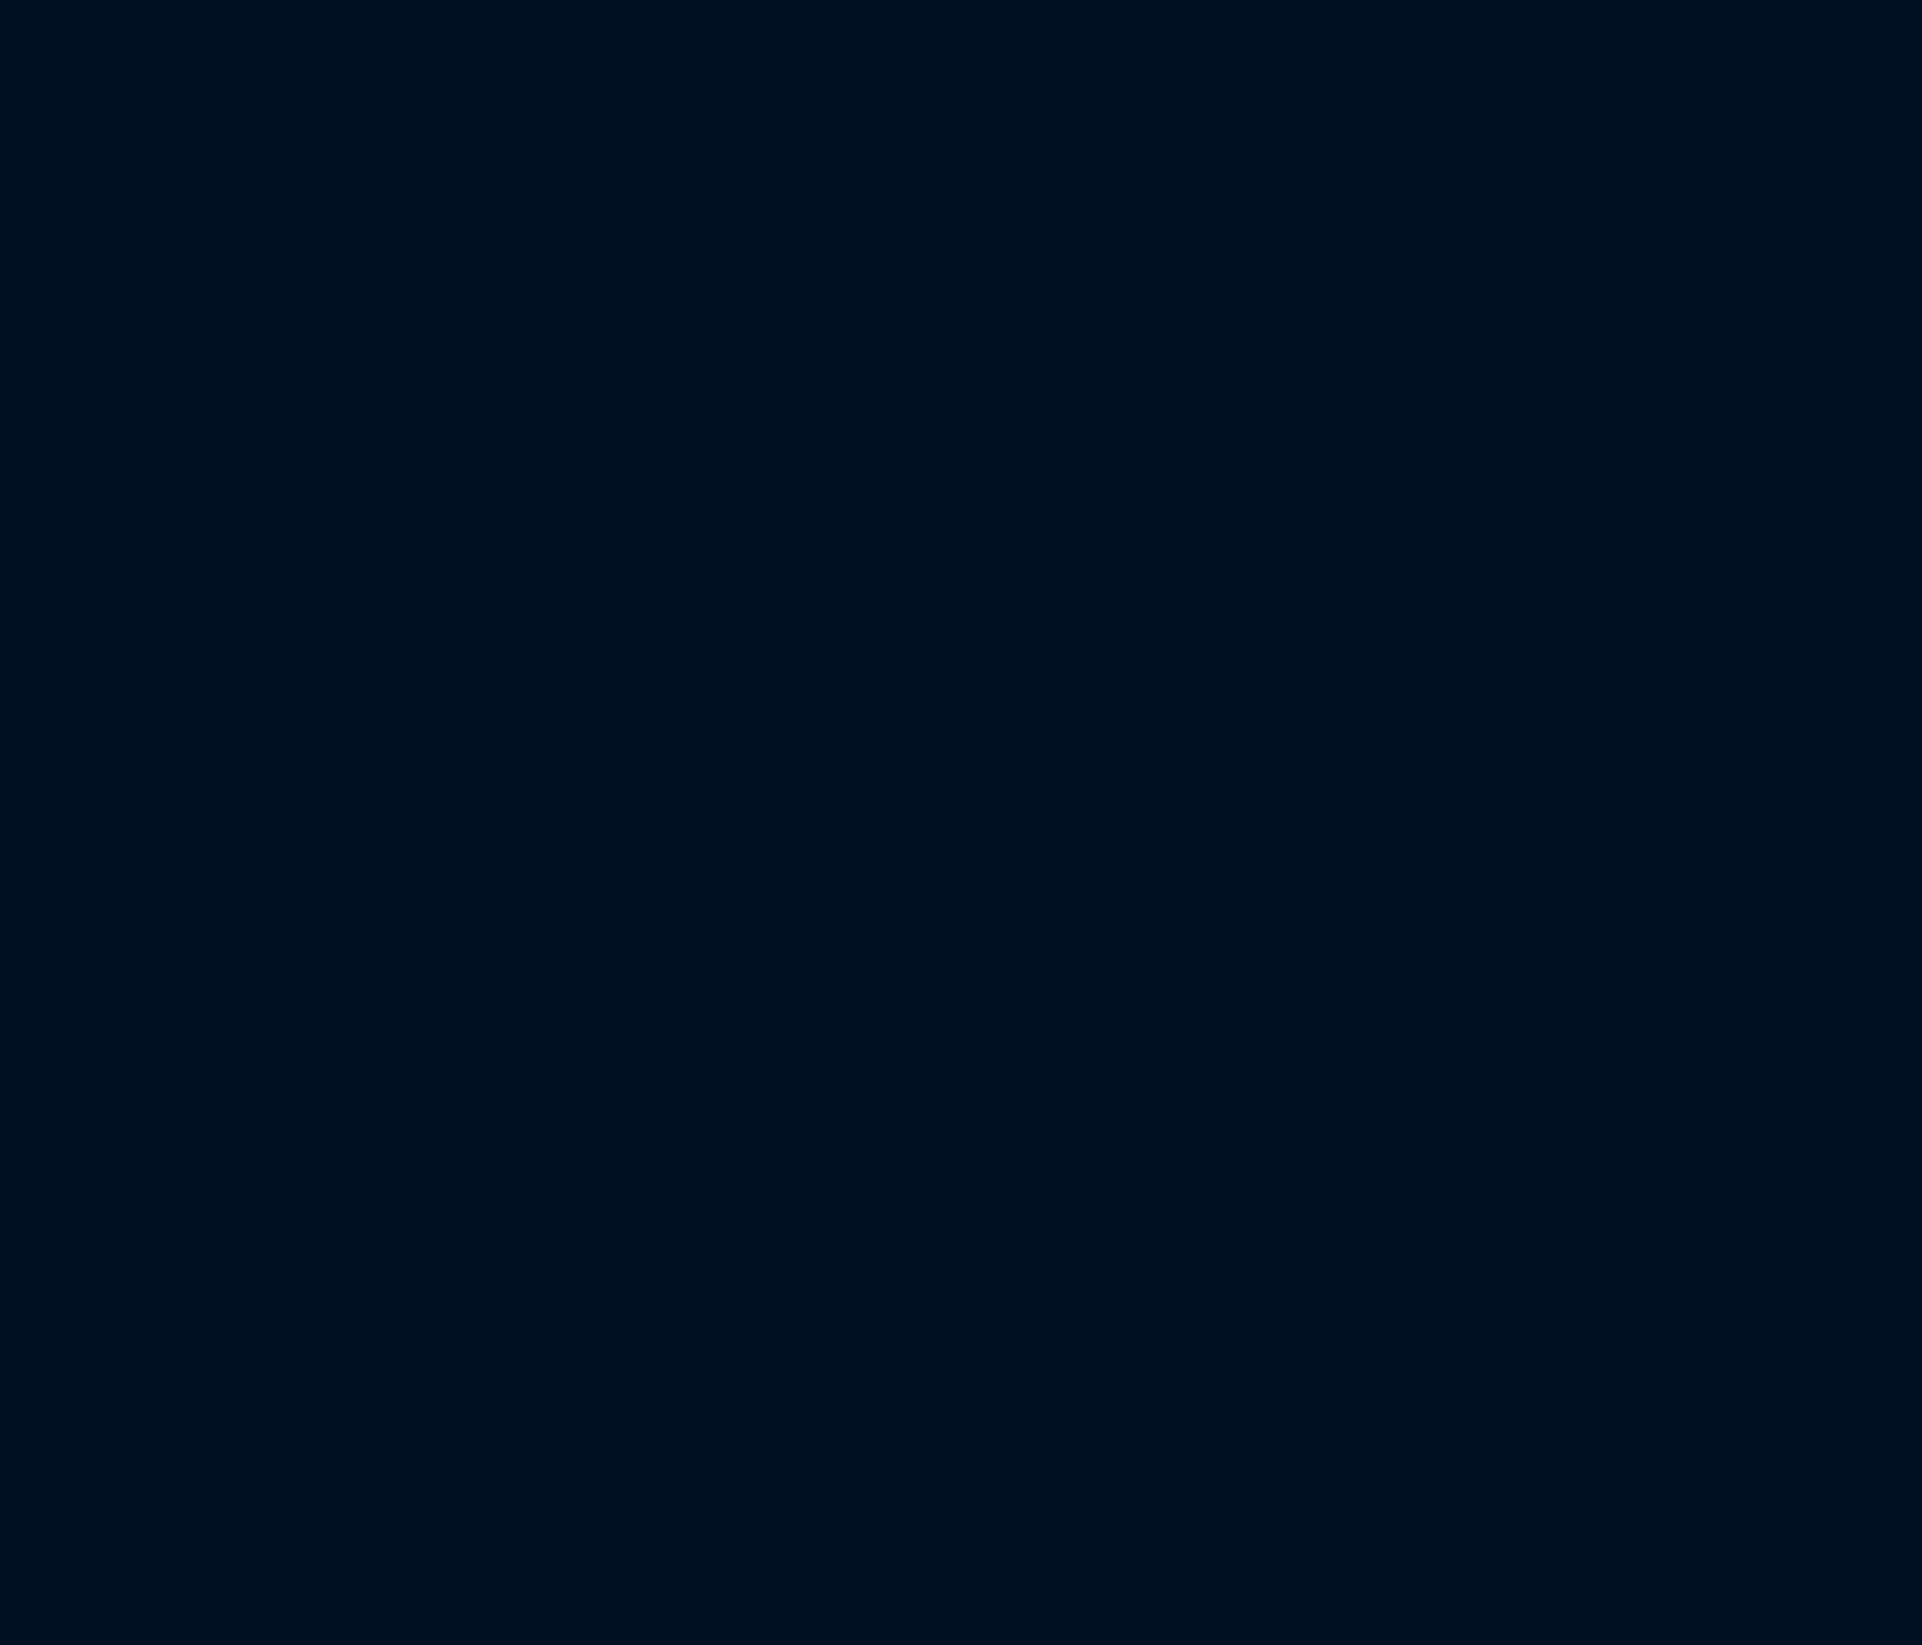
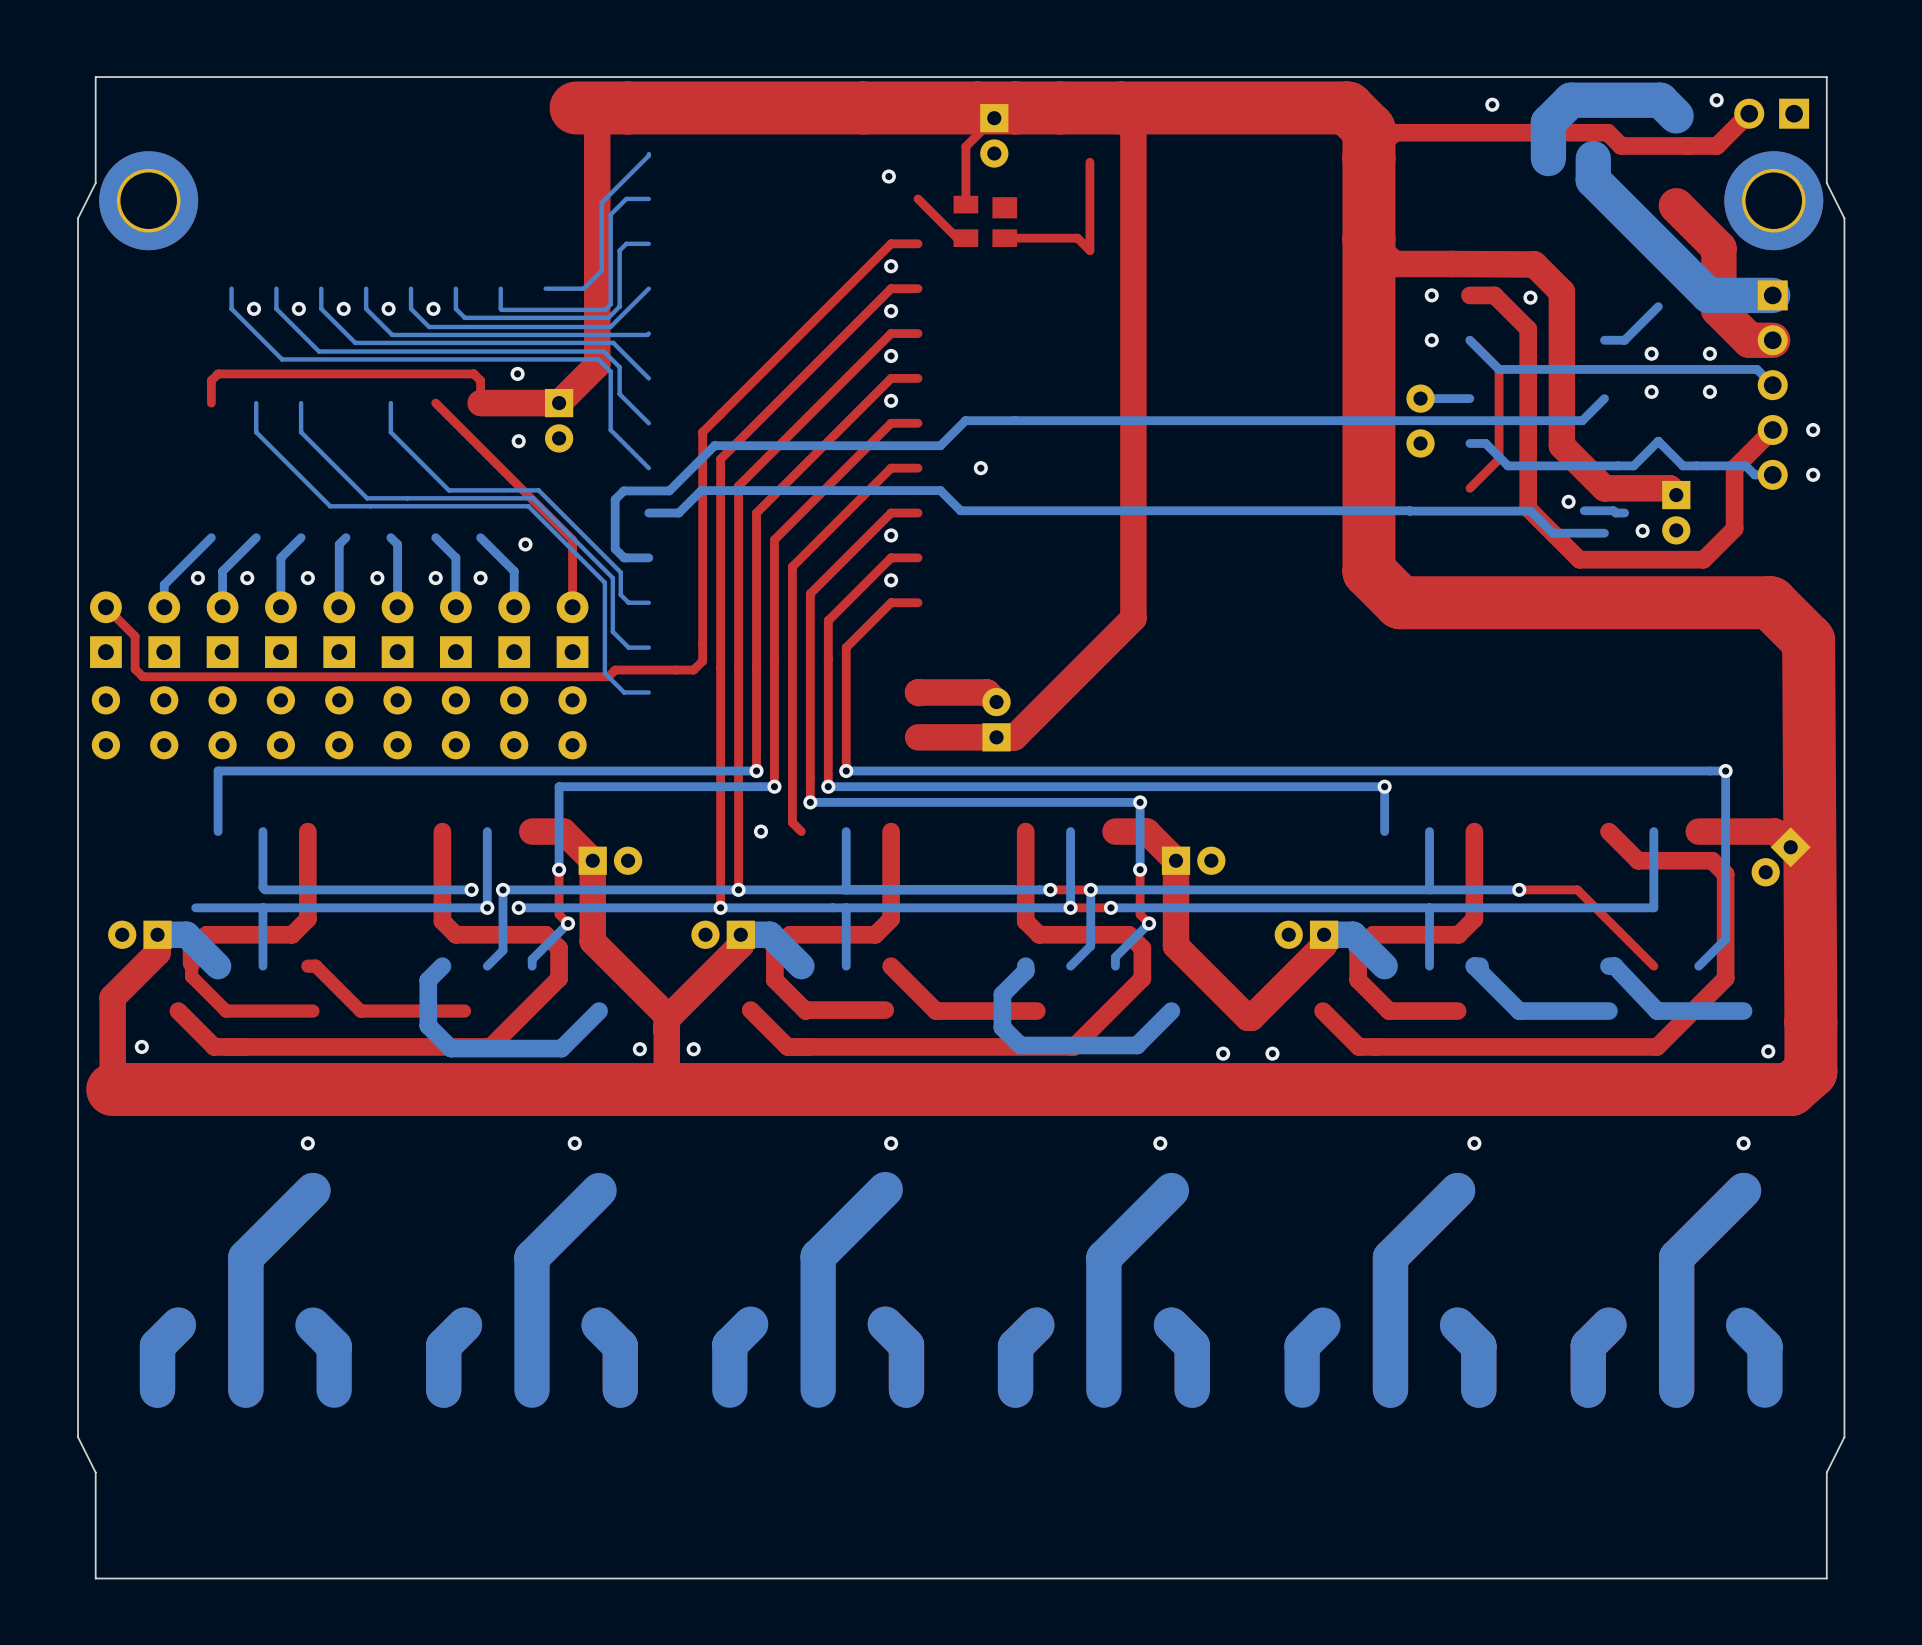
board edge: none -> (1826, 77) (1826, 183) (1844, 218) (1844, 1437) (1826, 1472) (1826, 1578) (95, 1578) (95, 1472) (78, 1437) (78, 218) (95, 183) (95, 77) (1826, 77)
via: none -> (1716, 100)
via: none -> (1492, 104)
top track: none -> (576, 107) (597, 129) (597, 364) (559, 403) (480, 403) (480, 380) (473, 373) (218, 373) (211, 380) (211, 403)
top track: none -> (576, 107) (1347, 107) (1368, 129) (1368, 571) (1400, 602) (1770, 602) (1808, 640) (1810, 1071) (1790, 1089) (112, 1089) (112, 997) (157, 952) (157, 934)
top track: none -> (1120, 107) (1133, 120) (1133, 618) (1014, 737) (918, 737)
top track: none -> (1749, 113) (1716, 145) (1621, 145) (1607, 132) (1394, 132) (1368, 158) (1368, 187)
part: none -> (1771, 113)
bottom track: none -> (1676, 115) (1660, 100) (1570, 100) (1548, 122) (1548, 158)
top track: none -> (994, 118) (965, 146) (965, 204)
part: none -> (994, 135)
bottom track: none -> (648, 154) (601, 202) (601, 270) (583, 288) (545, 288)
bottom track: none -> (1593, 158) (1593, 180) (1708, 295) (1772, 295)
top track: none -> (1089, 162) (1089, 250) (1077, 238) (1004, 238)
via: none -> (888, 176)
bottom track: none -> (648, 198) (626, 198) (610, 214) (610, 304) (605, 309) (501, 309) (500, 288)
top track: none -> (918, 198) (957, 238) (965, 238)
part: none -> (148, 200)
part: none -> (1773, 200)
top track: none -> (1676, 205) (1718, 248) (1718, 309) (1749, 340) (1772, 340)
part: none -> (985, 221)
top track: none -> (1368, 239) (1393, 264) (1534, 264) (1561, 291) (1561, 445) (1604, 488) (1669, 488) (1676, 495)
bottom track: none -> (648, 243) (626, 243) (619, 250) (619, 306) (608, 317) (464, 317) (455, 308) (455, 288)
top track: none -> (918, 243) (891, 243) (702, 432) (702, 661) (693, 670) (615, 670) (608, 676) (142, 676) (135, 669) (135, 636) (105, 607)
via: none -> (891, 266)
bottom track: none -> (231, 288) (231, 308) (282, 359) (598, 359) (610, 371) (610, 430) (648, 468)
bottom track: none -> (276, 288) (276, 308) (319, 351) (603, 351) (619, 367) (619, 394) (648, 423)
bottom track: none -> (321, 288) (321, 308) (355, 342) (613, 342) (648, 378)
bottom track: none -> (366, 288) (366, 308) (392, 334) (648, 333)
bottom track: none -> (648, 288) (610, 327) (429, 327) (411, 308) (411, 288)
top track: none -> (918, 288) (891, 288) (720, 459) (720, 907)
via: none -> (1431, 295)
top track: none -> (1469, 295) (1494, 295) (1528, 329) (1528, 508) (1579, 559) (1703, 559) (1734, 528) (1734, 468) (1772, 430)
via: none -> (1530, 297)
bottom track: none -> (1658, 306) (1624, 340) (1604, 340)
via: none -> (253, 308)
via: none -> (298, 308)
via: none -> (343, 308)
via: none -> (388, 308)
via: none -> (433, 308)
via: none -> (891, 311)
top track: none -> (918, 333) (891, 333) (738, 486) (738, 889)
via: none -> (1431, 340)
bottom track: none -> (1469, 340) (1499, 369) (1757, 369) (1772, 385)
top track: none -> (1469, 340) (1499, 369) (1499, 459) (1469, 488)
via: none -> (1651, 353)
via: none -> (1709, 353)
via: none -> (891, 355)
via: none -> (517, 373)
top track: none -> (918, 378) (891, 378) (756, 513) (756, 771)
part: none -> (1772, 385)
via: none -> (1651, 391)
via: none -> (1709, 391)
bottom track: none -> (1469, 398) (1420, 398)
bottom track: none -> (1604, 398) (1582, 420) (965, 420) (940, 445) (714, 445) (669, 490) (623, 490) (615, 499) (615, 548) (624, 557) (648, 557)
via: none -> (891, 400)
bottom track: none -> (256, 403) (256, 432) (330, 506) (528, 506) (604, 582) (604, 673) (624, 692) (648, 692)
bottom track: none -> (301, 403) (301, 432) (367, 498) (533, 498) (612, 577) (612, 631) (628, 647) (648, 647)
bottom track: none -> (390, 403) (390, 432) (448, 490) (538, 490) (620, 572) (620, 594) (628, 602) (648, 602)
top track: none -> (435, 403) (572, 539) (572, 607)
part: none -> (559, 420)
part: none -> (1420, 421)
top track: none -> (918, 423) (891, 423) (774, 539) (774, 786)
via: none -> (1813, 430)
via: none -> (518, 441)
bottom track: none -> (1469, 443) (1485, 443) (1508, 465) (1633, 465) (1658, 441) (1683, 465) (1745, 465) (1754, 474) (1772, 474)
top track: none -> (918, 468) (891, 468) (792, 566) (792, 822) (801, 831)
via: none -> (980, 468)
via: none -> (1813, 474)
via: none -> (1568, 501)
bottom track: none -> (1584, 510) (1613, 510) (1615, 513) (1624, 513)
part: none -> (1676, 512)
bottom track: none -> (648, 513) (678, 513) (701, 490) (940, 490) (960, 510) (1530, 511) (1552, 533) (1604, 533)
top track: none -> (918, 513) (891, 513) (810, 593) (810, 802)
via: none -> (1642, 530)
via: none -> (891, 535)
bottom track: none -> (211, 537) (164, 584) (164, 607)
bottom track: none -> (256, 537) (222, 571) (222, 607) (233, 607)
bottom track: none -> (301, 537) (280, 557) (280, 607)
bottom track: none -> (345, 537) (339, 544) (339, 607)
bottom track: none -> (390, 537) (397, 544) (397, 607)
bottom track: none -> (435, 537) (455, 557) (455, 607)
bottom track: none -> (480, 537) (514, 571) (514, 607)
via: none -> (525, 544)
top track: none -> (918, 557) (891, 557) (828, 620) (828, 786)
via: none -> (197, 578)
via: none -> (247, 578)
via: none -> (307, 578)
via: none -> (377, 578)
via: none -> (435, 578)
via: none -> (480, 578)
via: none -> (891, 580)
top track: none -> (918, 602) (891, 602) (846, 647) (846, 771)
part: none -> (105, 629)
part: none -> (164, 629)
part: none -> (222, 629)
part: none -> (280, 629)
part: none -> (339, 629)
part: none -> (397, 629)
part: none -> (455, 629)
part: none -> (514, 629)
part: none -> (572, 629)
top track: none -> (918, 693) (987, 692) (996, 702)
part: none -> (996, 719)
part: none -> (105, 722)
part: none -> (164, 722)
part: none -> (222, 722)
part: none -> (280, 722)
part: none -> (339, 722)
part: none -> (397, 722)
part: none -> (455, 722)
part: none -> (514, 722)
part: none -> (572, 722)
bottom track: none -> (756, 771) (218, 771) (218, 831)
via: none -> (756, 771)
bottom track: none -> (846, 771) (1725, 771) (1725, 939) (1698, 966)
via: none -> (846, 771)
via: none -> (1725, 771)
bottom track: none -> (774, 786) (559, 786) (559, 869)
via: none -> (774, 786)
bottom track: none -> (828, 786) (1384, 786) (1384, 831)
via: none -> (828, 786)
via: none -> (1384, 786)
bottom track: none -> (810, 802) (1140, 802) (1140, 869)
via: none -> (810, 802)
via: none -> (1140, 802)
bottom track: none -> (262, 831) (262, 887) (265, 889) (471, 889)
top track: none -> (307, 831) (307, 919) (292, 934) (206, 934) (191, 950) (191, 976) (226, 1011) (312, 1011)
top track: none -> (442, 831) (442, 921) (455, 934) (545, 934) (559, 948) (559, 978) (490, 1046) (214, 1046) (178, 1011)
bottom track: none -> (487, 831) (487, 907) (195, 907)
top track: none -> (532, 831) (563, 831) (592, 860) (592, 941) (666, 1015)
via: none -> (760, 831)
bottom track: none -> (846, 831) (846, 889)
top track: none -> (891, 831) (891, 919) (875, 934) (790, 934) (774, 950) (774, 980) (805, 1011) (885, 1010)
top track: none -> (1025, 831) (1025, 921) (1039, 934) (1128, 934) (1142, 948) (1142, 978) (1073, 1046) (787, 1046) (750, 1010)
bottom track: none -> (1070, 831) (1070, 907) (518, 907)
top track: none -> (1115, 831) (1146, 831) (1176, 860) (1176, 945) (1247, 1017) (1251, 1017) (1324, 945) (1324, 934)
bottom track: none -> (1429, 831) (1429, 889)
top track: none -> (1474, 831) (1474, 919) (1458, 934) (1373, 934) (1358, 950) (1358, 980) (1389, 1011) (1457, 1011)
top track: none -> (1608, 831) (1638, 860) (1712, 860) (1725, 874) (1725, 978) (1657, 1046) (1358, 1046) (1323, 1011)
bottom track: none -> (1653, 831) (1653, 907) (1110, 907)
top track: none -> (1698, 831) (1774, 831) (1790, 847)
part: none -> (1781, 856)
part: none -> (610, 860)
part: none -> (1193, 860)
top track: none -> (559, 869) (559, 914) (568, 923)
via: none -> (559, 869)
top track: none -> (1140, 869) (1140, 914) (1149, 923)
via: none -> (1140, 869)
via: none -> (471, 889)
via: none -> (503, 889)
via: none -> (738, 889)
bottom track: none -> (1050, 889) (503, 889) (503, 950) (487, 966)
via: none -> (1050, 889)
top track: none -> (1090, 889) (1050, 889)
via: none -> (1090, 889)
bottom track: none -> (1519, 889) (1090, 889) (1090, 945) (1070, 966)
top track: none -> (1519, 889) (1577, 889) (1653, 966)
via: none -> (1519, 889)
bottom track: none -> (262, 907) (262, 966)
via: none -> (487, 907)
via: none -> (518, 907)
via: none -> (720, 907)
bottom track: none -> (846, 907) (846, 966)
via: none -> (1070, 907)
top track: none -> (1110, 907) (1070, 907)
via: none -> (1110, 907)
bottom track: none -> (1429, 907) (1429, 966)
bottom track: none -> (568, 923) (532, 959) (532, 966)
via: none -> (568, 923)
bottom track: none -> (1149, 923) (1115, 957) (1115, 966)
via: none -> (1149, 923)
part: none -> (139, 934)
bottom track: none -> (157, 934) (186, 934) (218, 966)
part: none -> (723, 934)
bottom track: none -> (740, 934) (769, 934) (801, 966)
top track: none -> (740, 934) (740, 945) (670, 1015) (666, 1015)
part: none -> (1306, 934)
bottom track: none -> (1324, 934) (1353, 934) (1384, 966)
top track: none -> (307, 966) (315, 966) (360, 1011) (464, 1011)
bottom track: none -> (442, 966) (428, 980) (428, 1025) (451, 1048) (561, 1048) (599, 1011)
top track: none -> (891, 966) (935, 1011) (1036, 1011)
bottom track: none -> (1025, 966) (1025, 971) (1002, 994) (1002, 1027) (1020, 1045) (1136, 1045) (1171, 1011)
bottom track: none -> (1480, 966) (1474, 966) (1519, 1011) (1608, 1011)
bottom track: none -> (1608, 966) (1614, 966) (1657, 1011) (1743, 1011)
top track: none -> (666, 1015) (666, 1064)
via: none -> (141, 1046)
via: none -> (639, 1049)
via: none -> (693, 1049)
via: none -> (1768, 1051)
via: none -> (1223, 1053)
via: none -> (1272, 1053)
via: none -> (307, 1143)
via: none -> (574, 1143)
via: none -> (891, 1143)
via: none -> (1160, 1143)
via: none -> (1474, 1143)
via: none -> (1743, 1143)
bottom track: none -> (885, 1189) (818, 1256) (818, 1390)
bottom track: none -> (312, 1190) (245, 1257) (245, 1390)
bottom track: none -> (599, 1190) (531, 1257) (531, 1390)
bottom track: none -> (1171, 1190) (1103, 1258) (1103, 1390)
bottom track: none -> (1457, 1190) (1390, 1257) (1390, 1390)
bottom track: none -> (1743, 1190) (1676, 1257) (1676, 1390)
bottom track: none -> (750, 1324) (729, 1345) (729, 1390)
bottom track: none -> (885, 1324) (906, 1345) (906, 1390)
bottom track: none -> (178, 1325) (157, 1345) (157, 1390)
bottom track: none -> (312, 1325) (334, 1346) (334, 1390)
bottom track: none -> (464, 1325) (443, 1345) (443, 1390)
bottom track: none -> (599, 1325) (620, 1346) (620, 1390)
bottom track: none -> (1036, 1325) (1015, 1346) (1015, 1390)
bottom track: none -> (1171, 1325) (1192, 1345) (1192, 1390)
bottom track: none -> (1323, 1325) (1302, 1345) (1302, 1390)
bottom track: none -> (1457, 1325) (1478, 1346) (1478, 1390)
bottom track: none -> (1608, 1325) (1588, 1345) (1588, 1390)
bottom track: none -> (1743, 1325) (1764, 1346) (1764, 1390)

